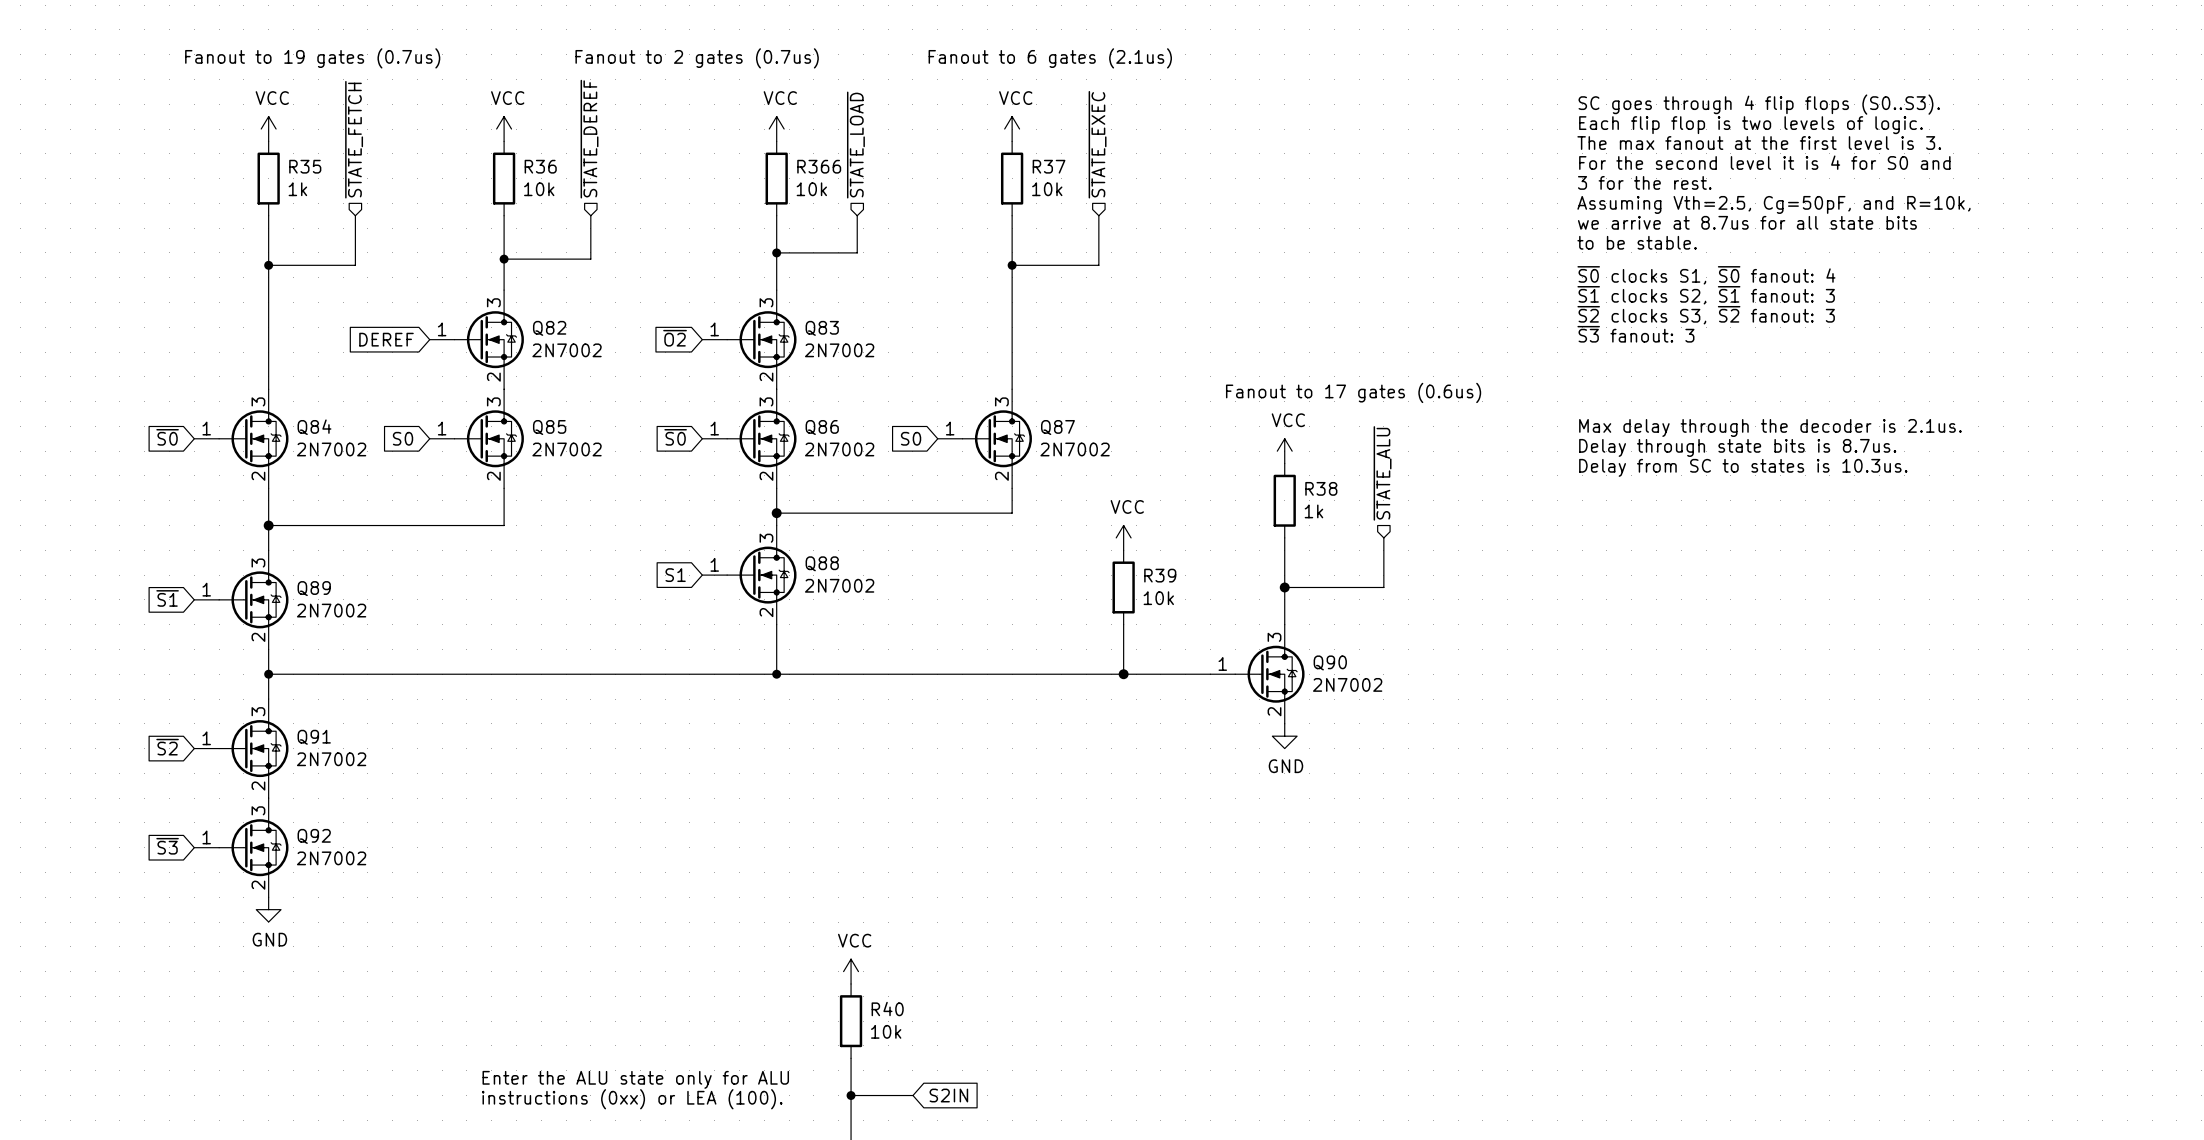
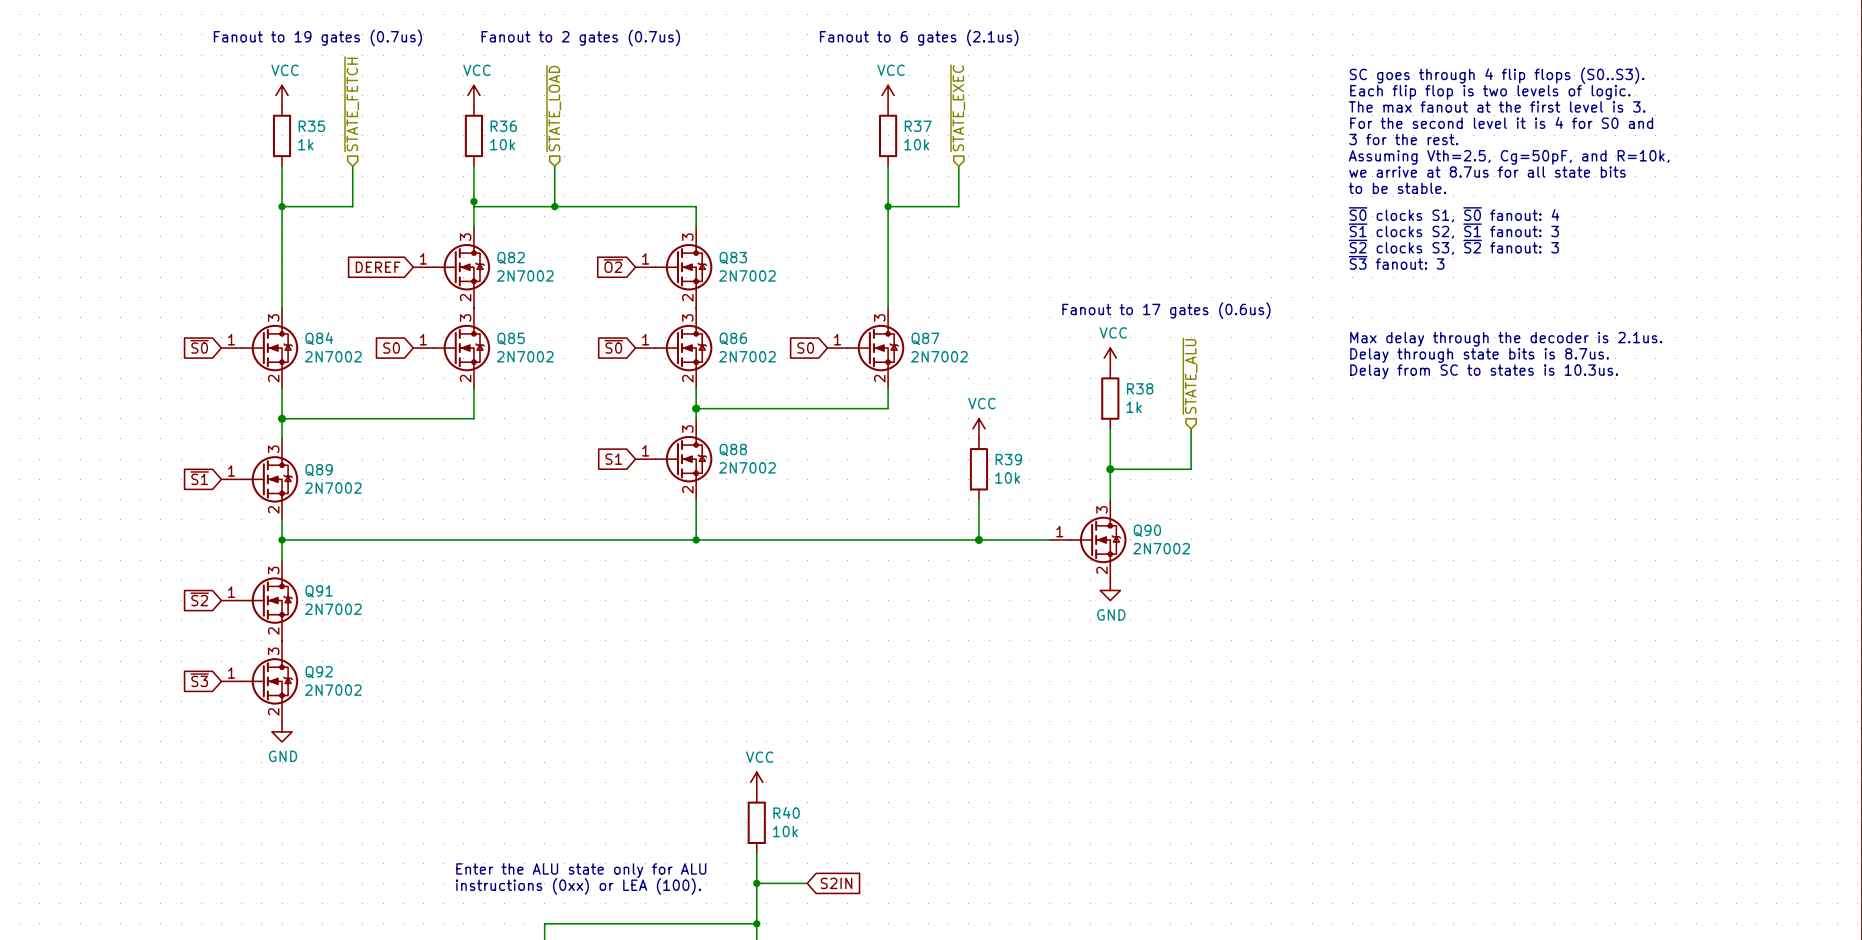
text position: Fanout to 2 gates (0.7us) (697, 58) -> Fanout to 2 gates (0.7us) (580, 37)
power symbol: VCC (776, 129) -> none
hierarchical label: ~{STATE_DEREF} (589, 139) -> ~{STATE_LOAD} (553, 108)
hierarchical label: ~{STATE_LOAD} (855, 145) -> none
R366: 10k (776, 178) -> none
wire: (590, 215) (590, 259) (504, 259) -> none
wire: none -> (554, 166) (554, 206)
wire: (776, 215) (776, 265) -> (473, 206) (696, 206)
wire: (857, 215) (857, 252) (776, 252) -> none
junction: (776, 252) -> none
junction: none -> (554, 206)

